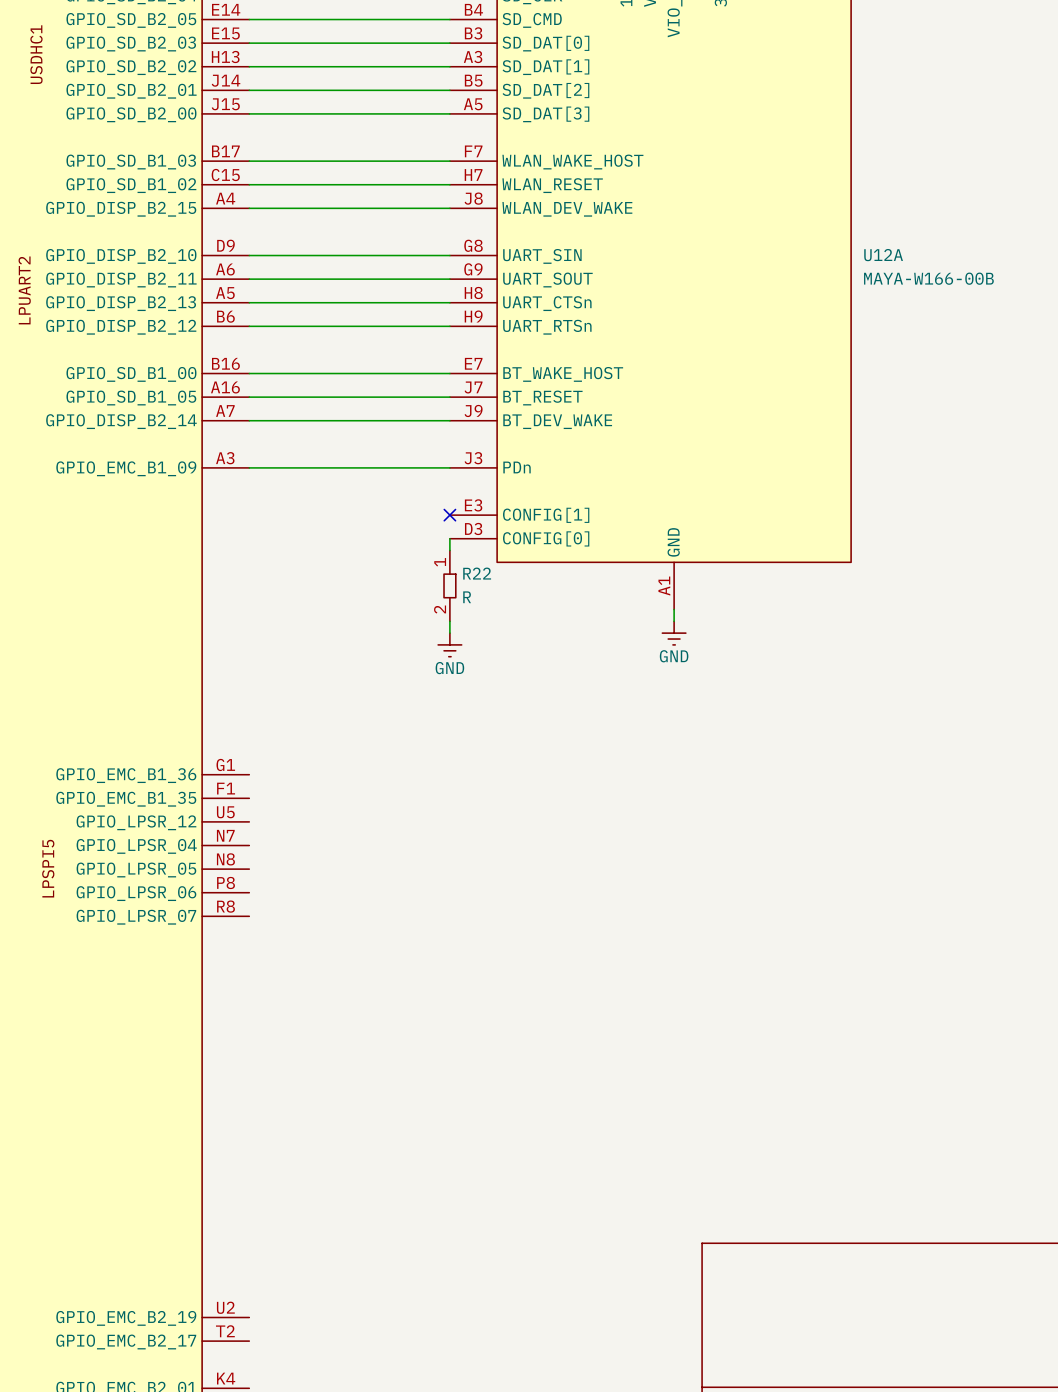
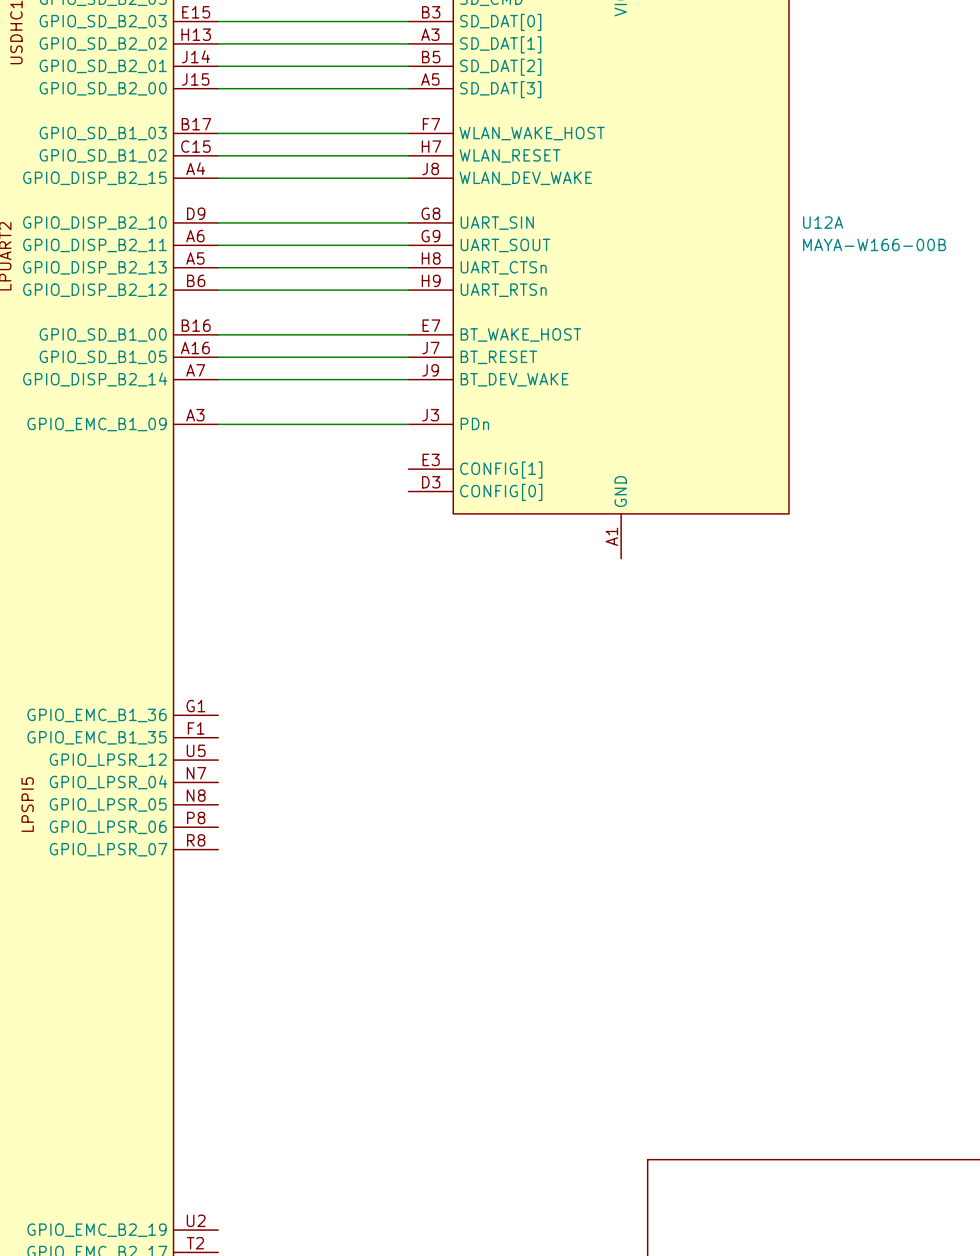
no-connect mark: (449, 515) -> none
wire: (449, 538) (449, 550) -> none
R22: R (449, 585) -> none
wire: (674, 609) (674, 621) -> none
wire: (449, 621) (449, 633) -> none
power symbol: GND (674, 633) -> none
power symbol: GND (449, 644) -> none

